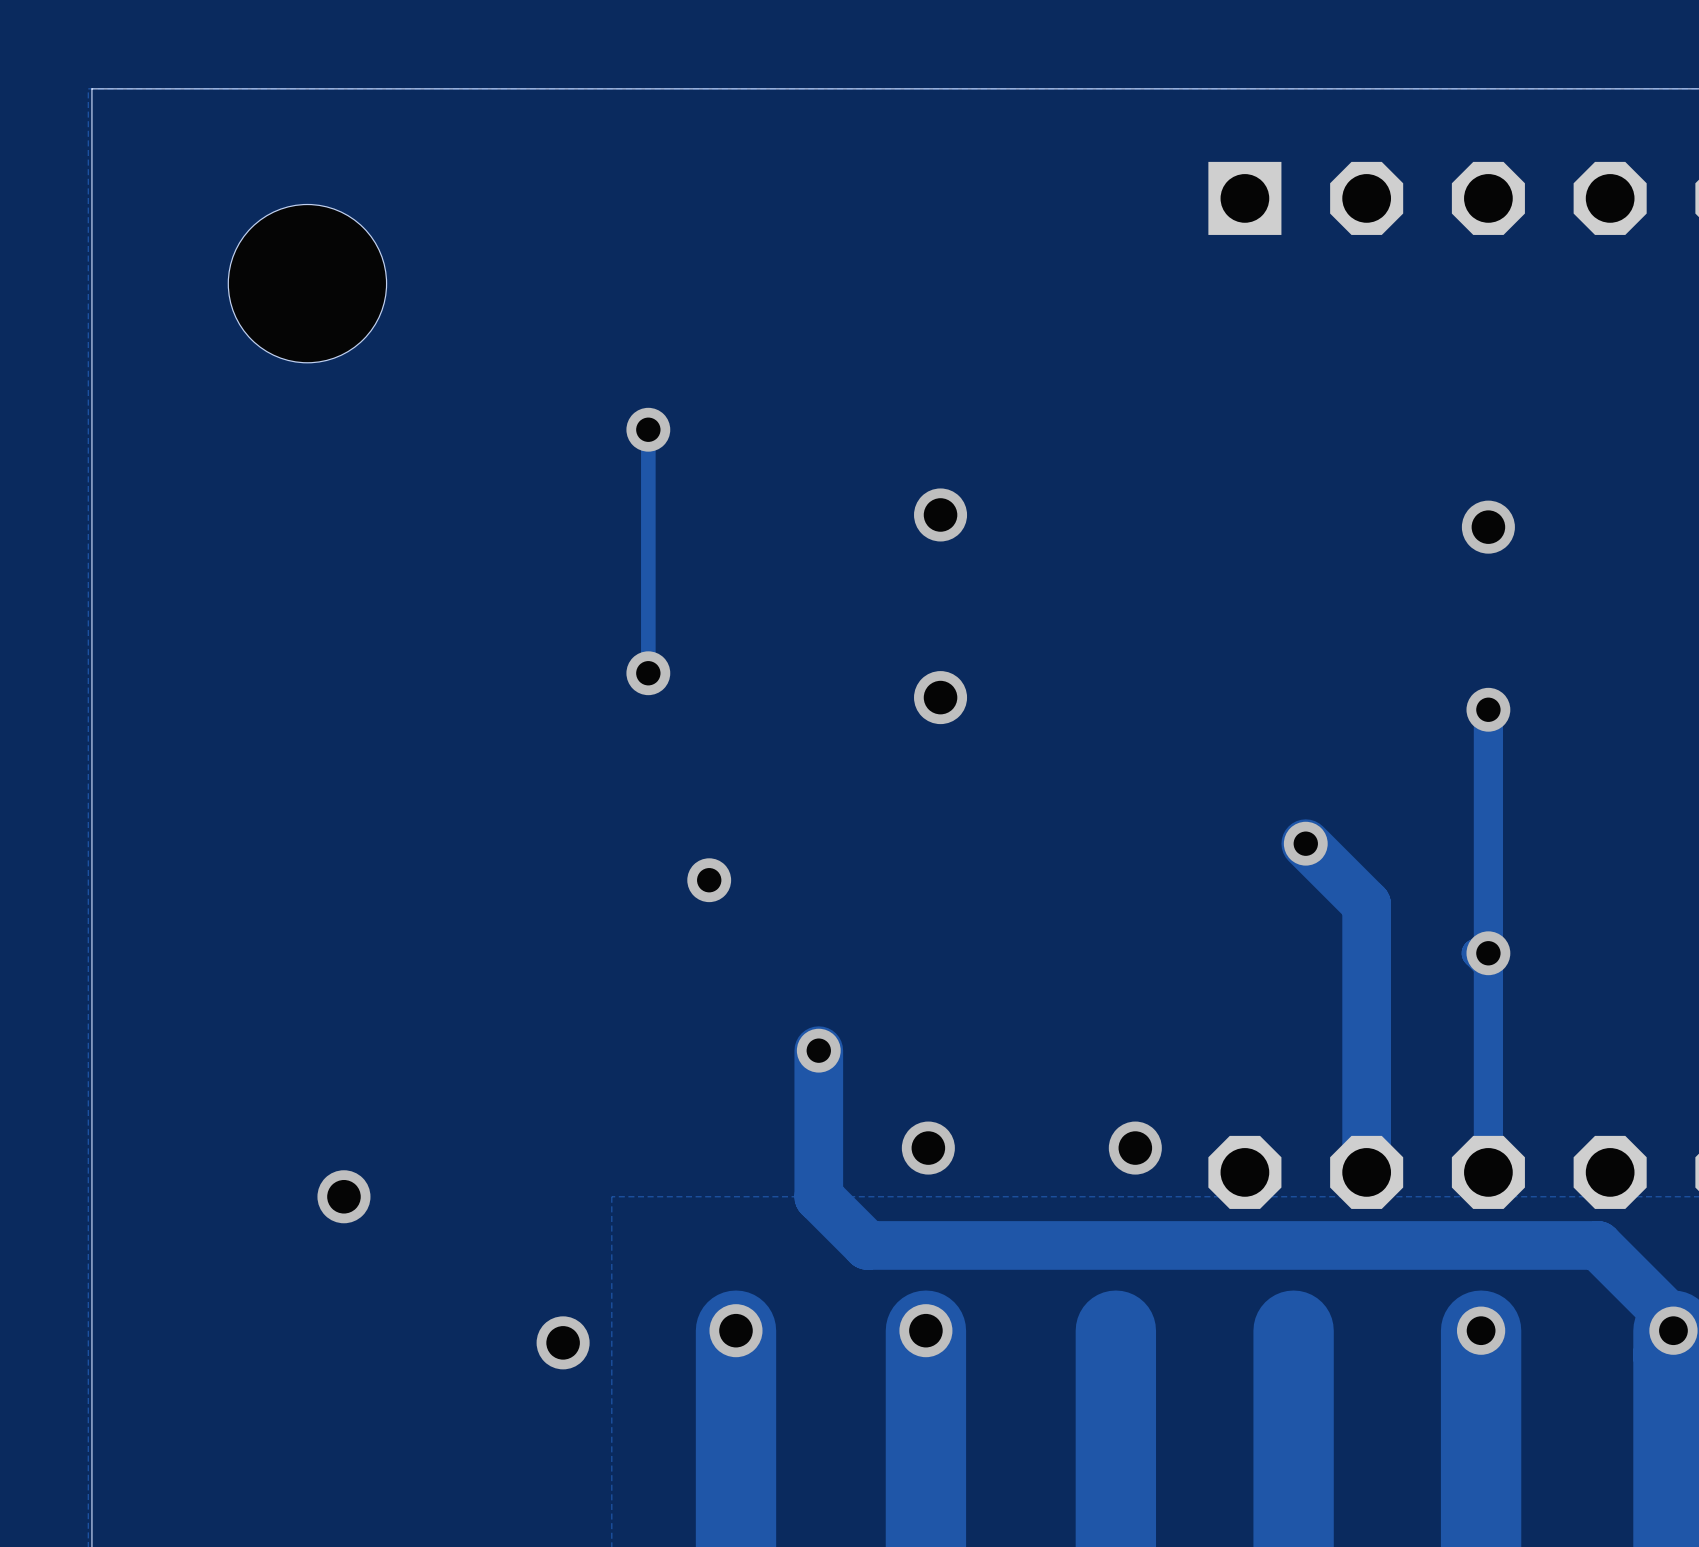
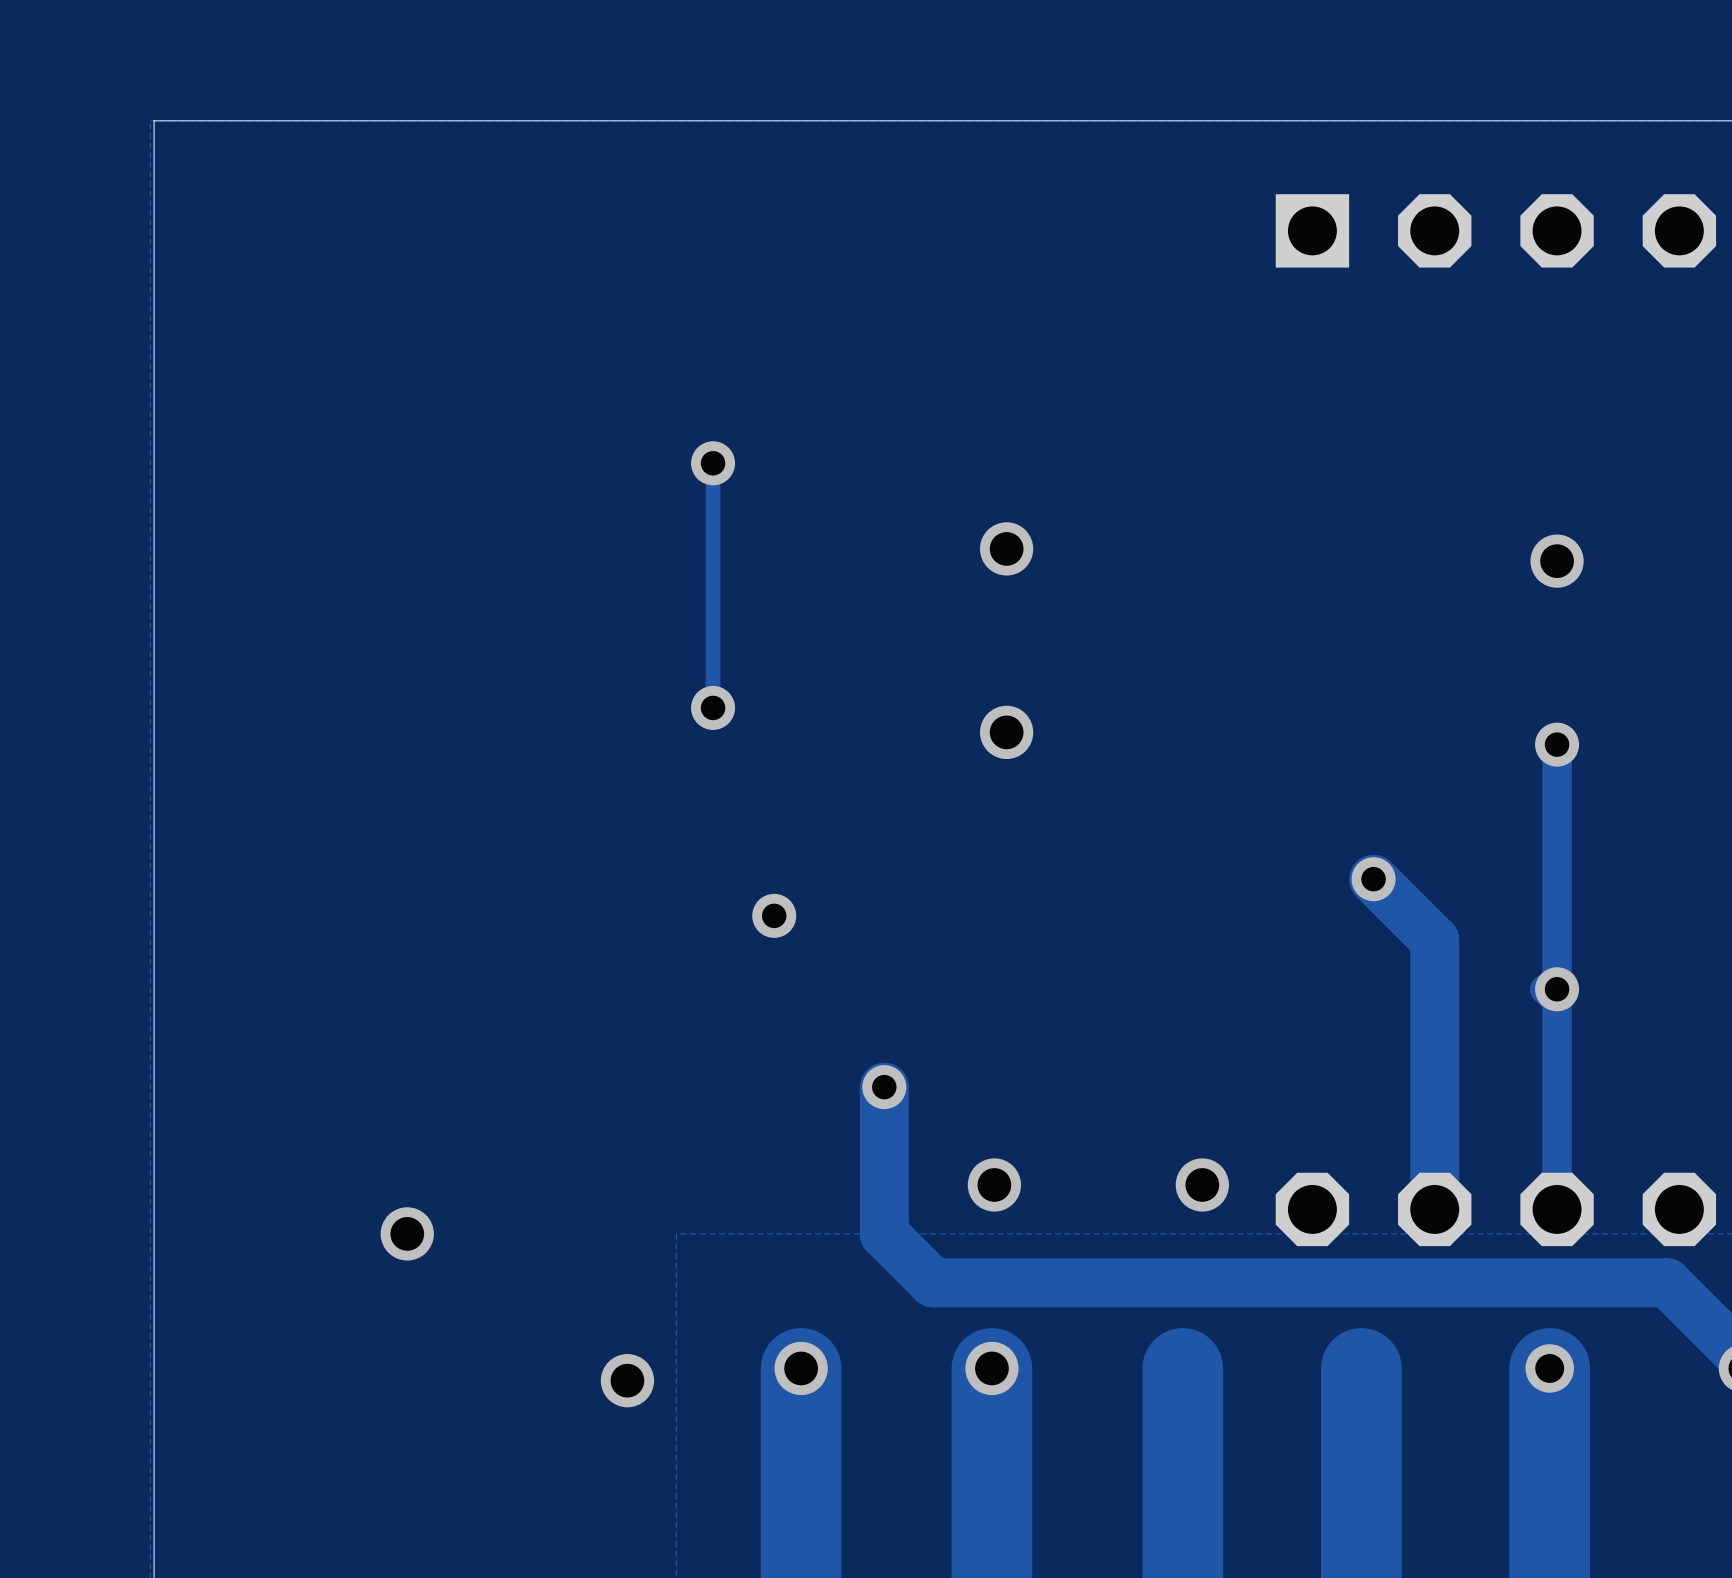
hole: (307, 283) -> none

